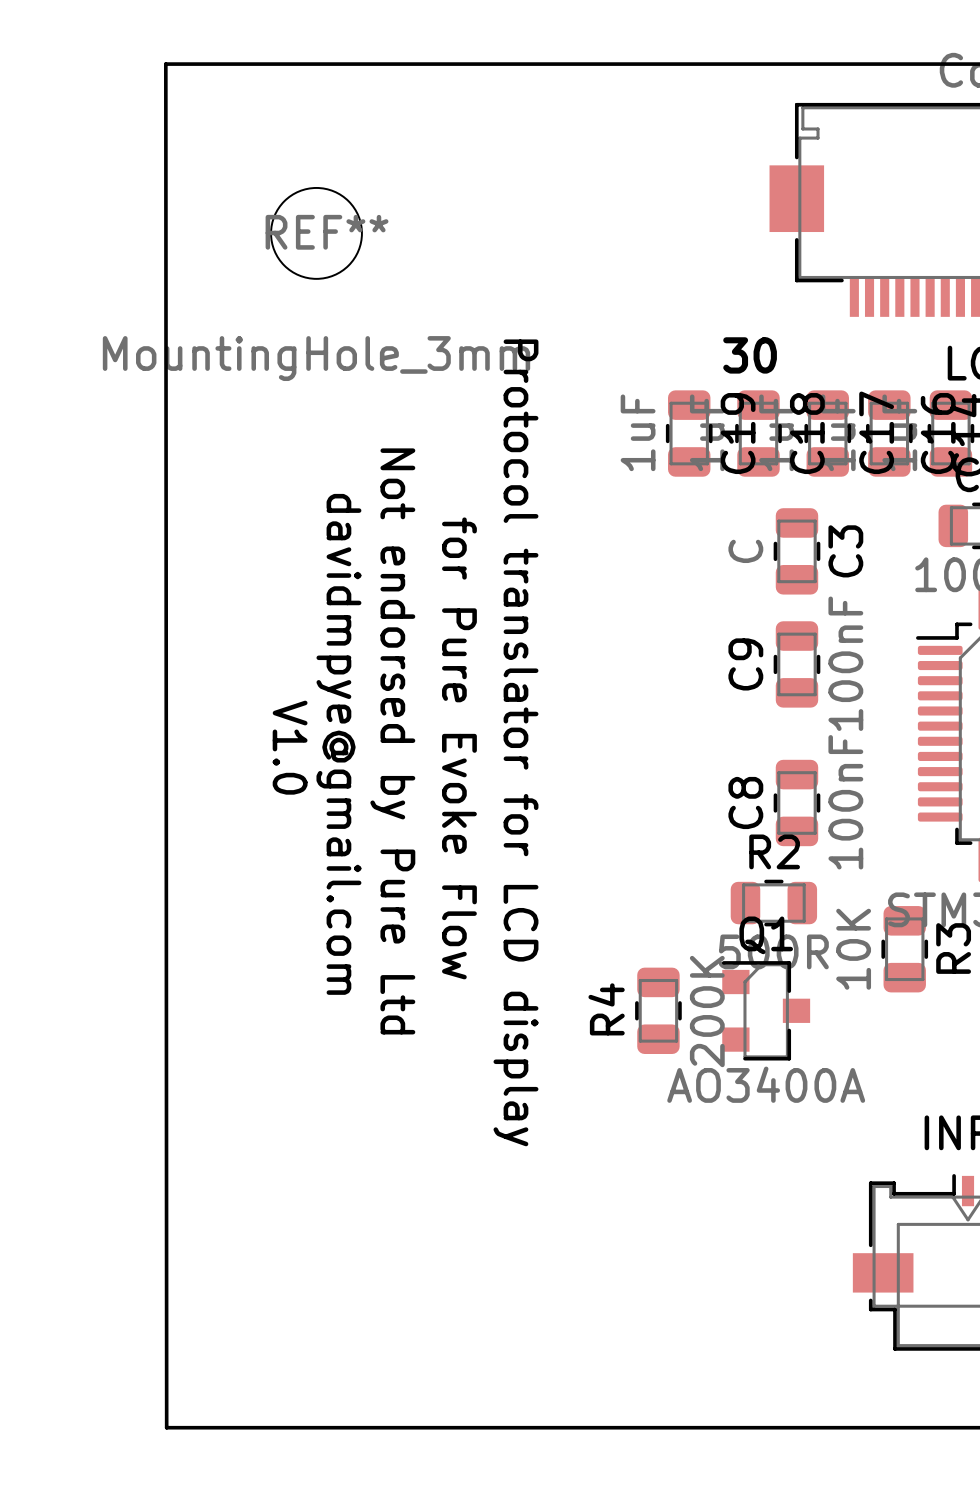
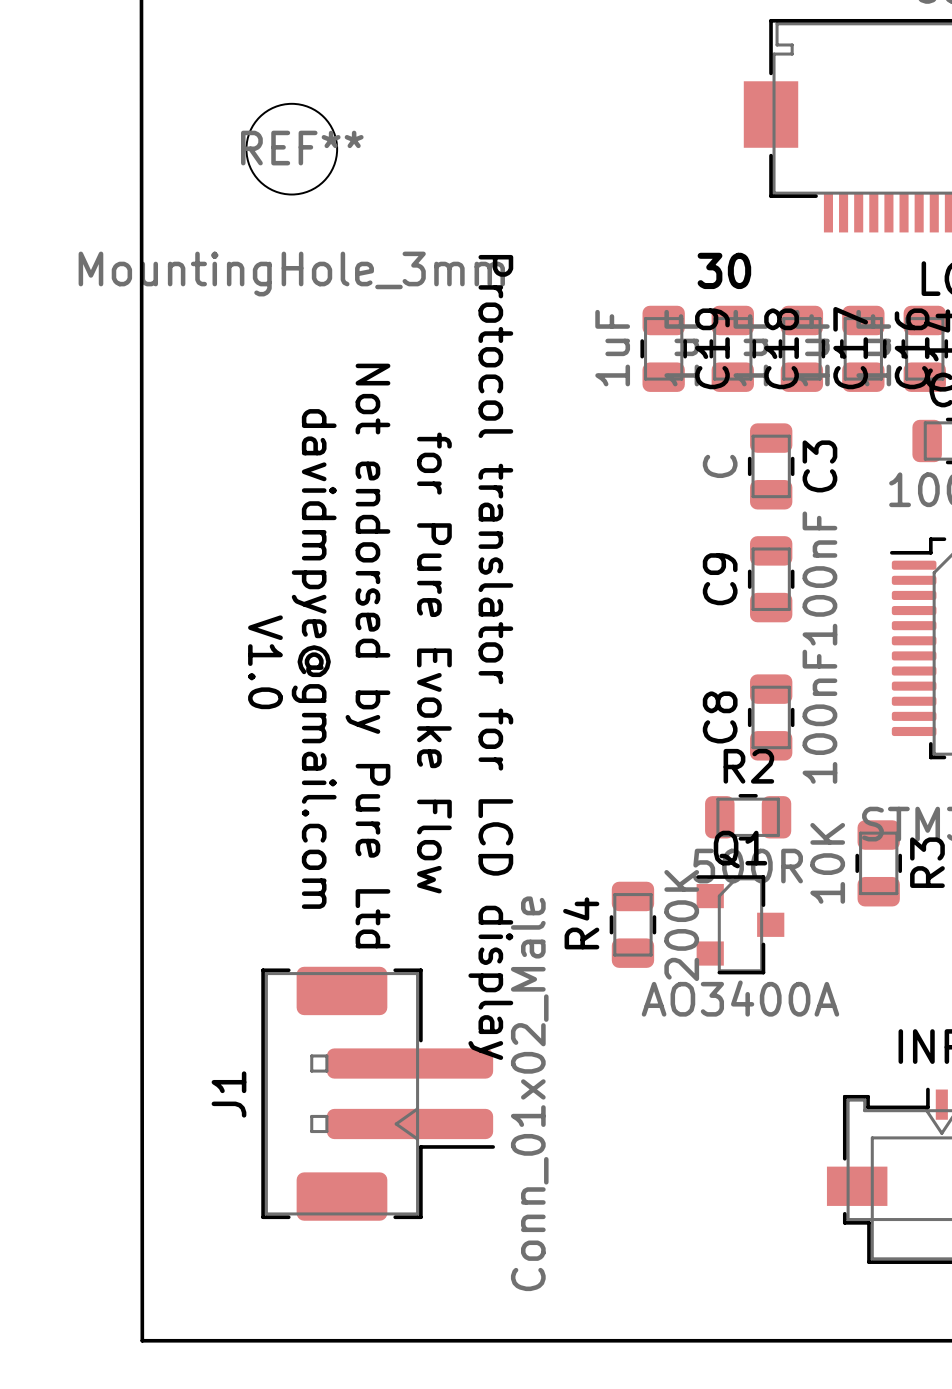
J1: none -> Conn_01x02_Male (378, 1093)

